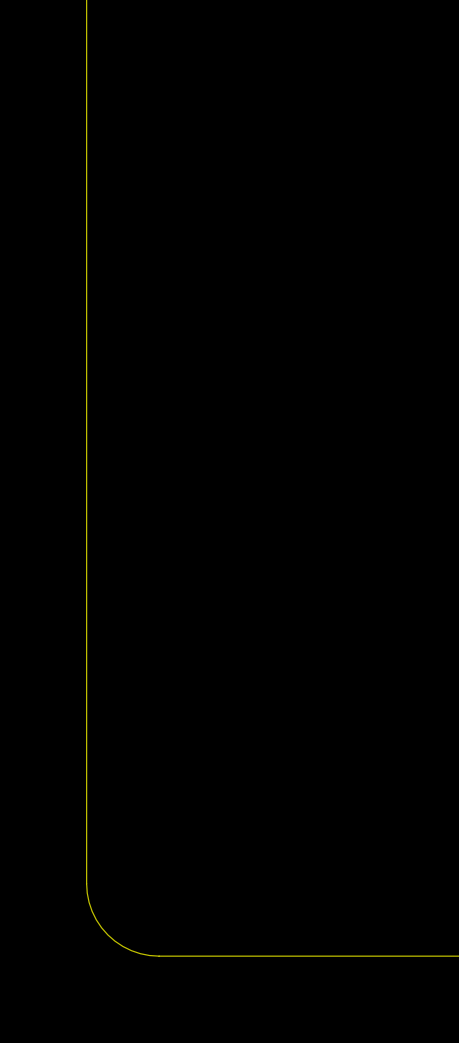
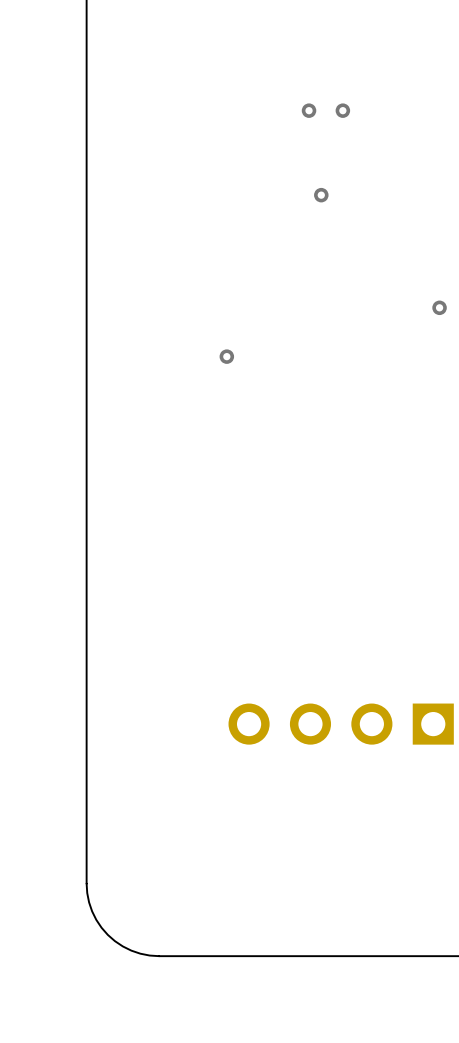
via: none -> (309, 110)
via: none -> (342, 110)
via: none -> (321, 195)
via: none -> (439, 307)
via: none -> (226, 356)
part: none -> (341, 724)

